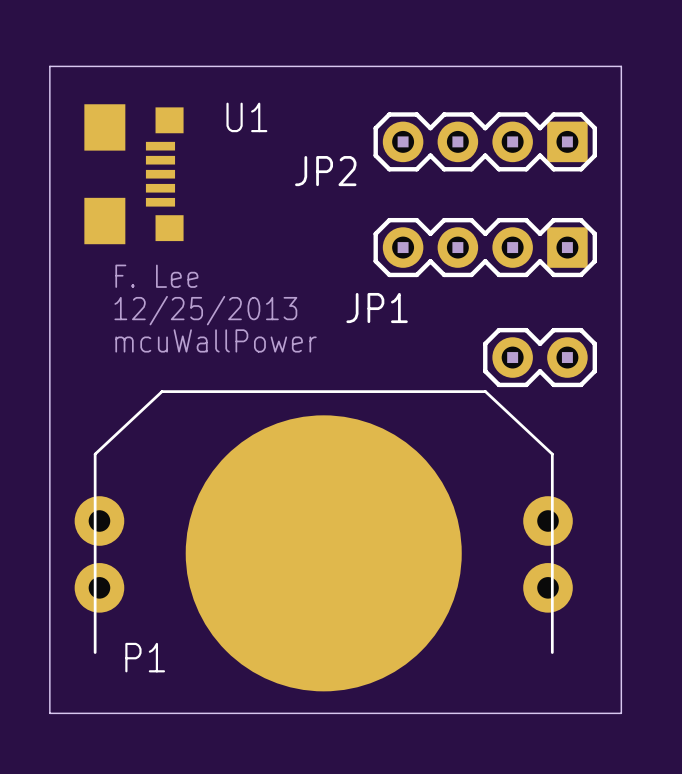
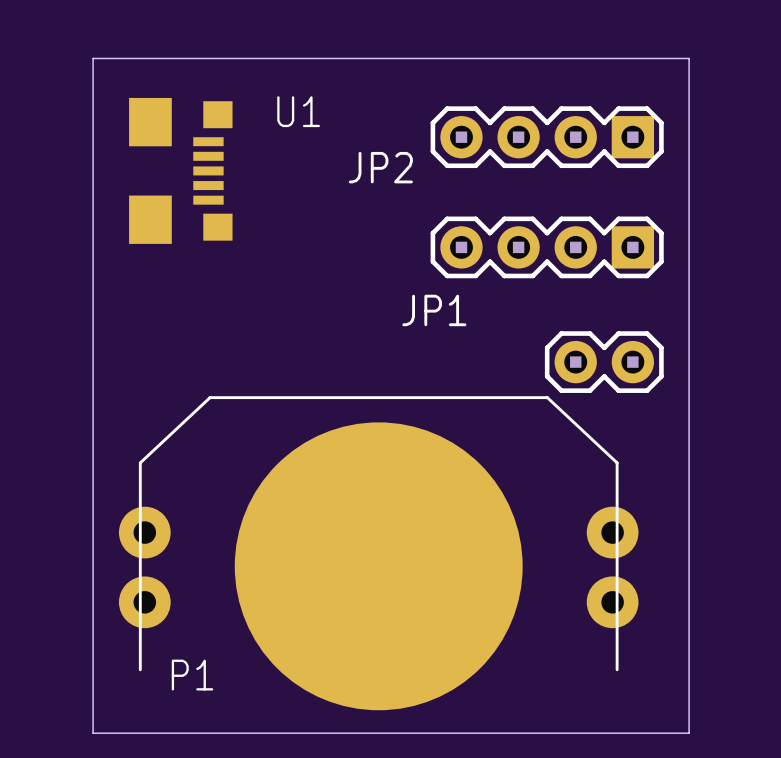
text: F. Lee (156, 276) -> none
text: 12/25/2013 (205, 310) -> none
text: mcuWallPower (216, 340) -> none

